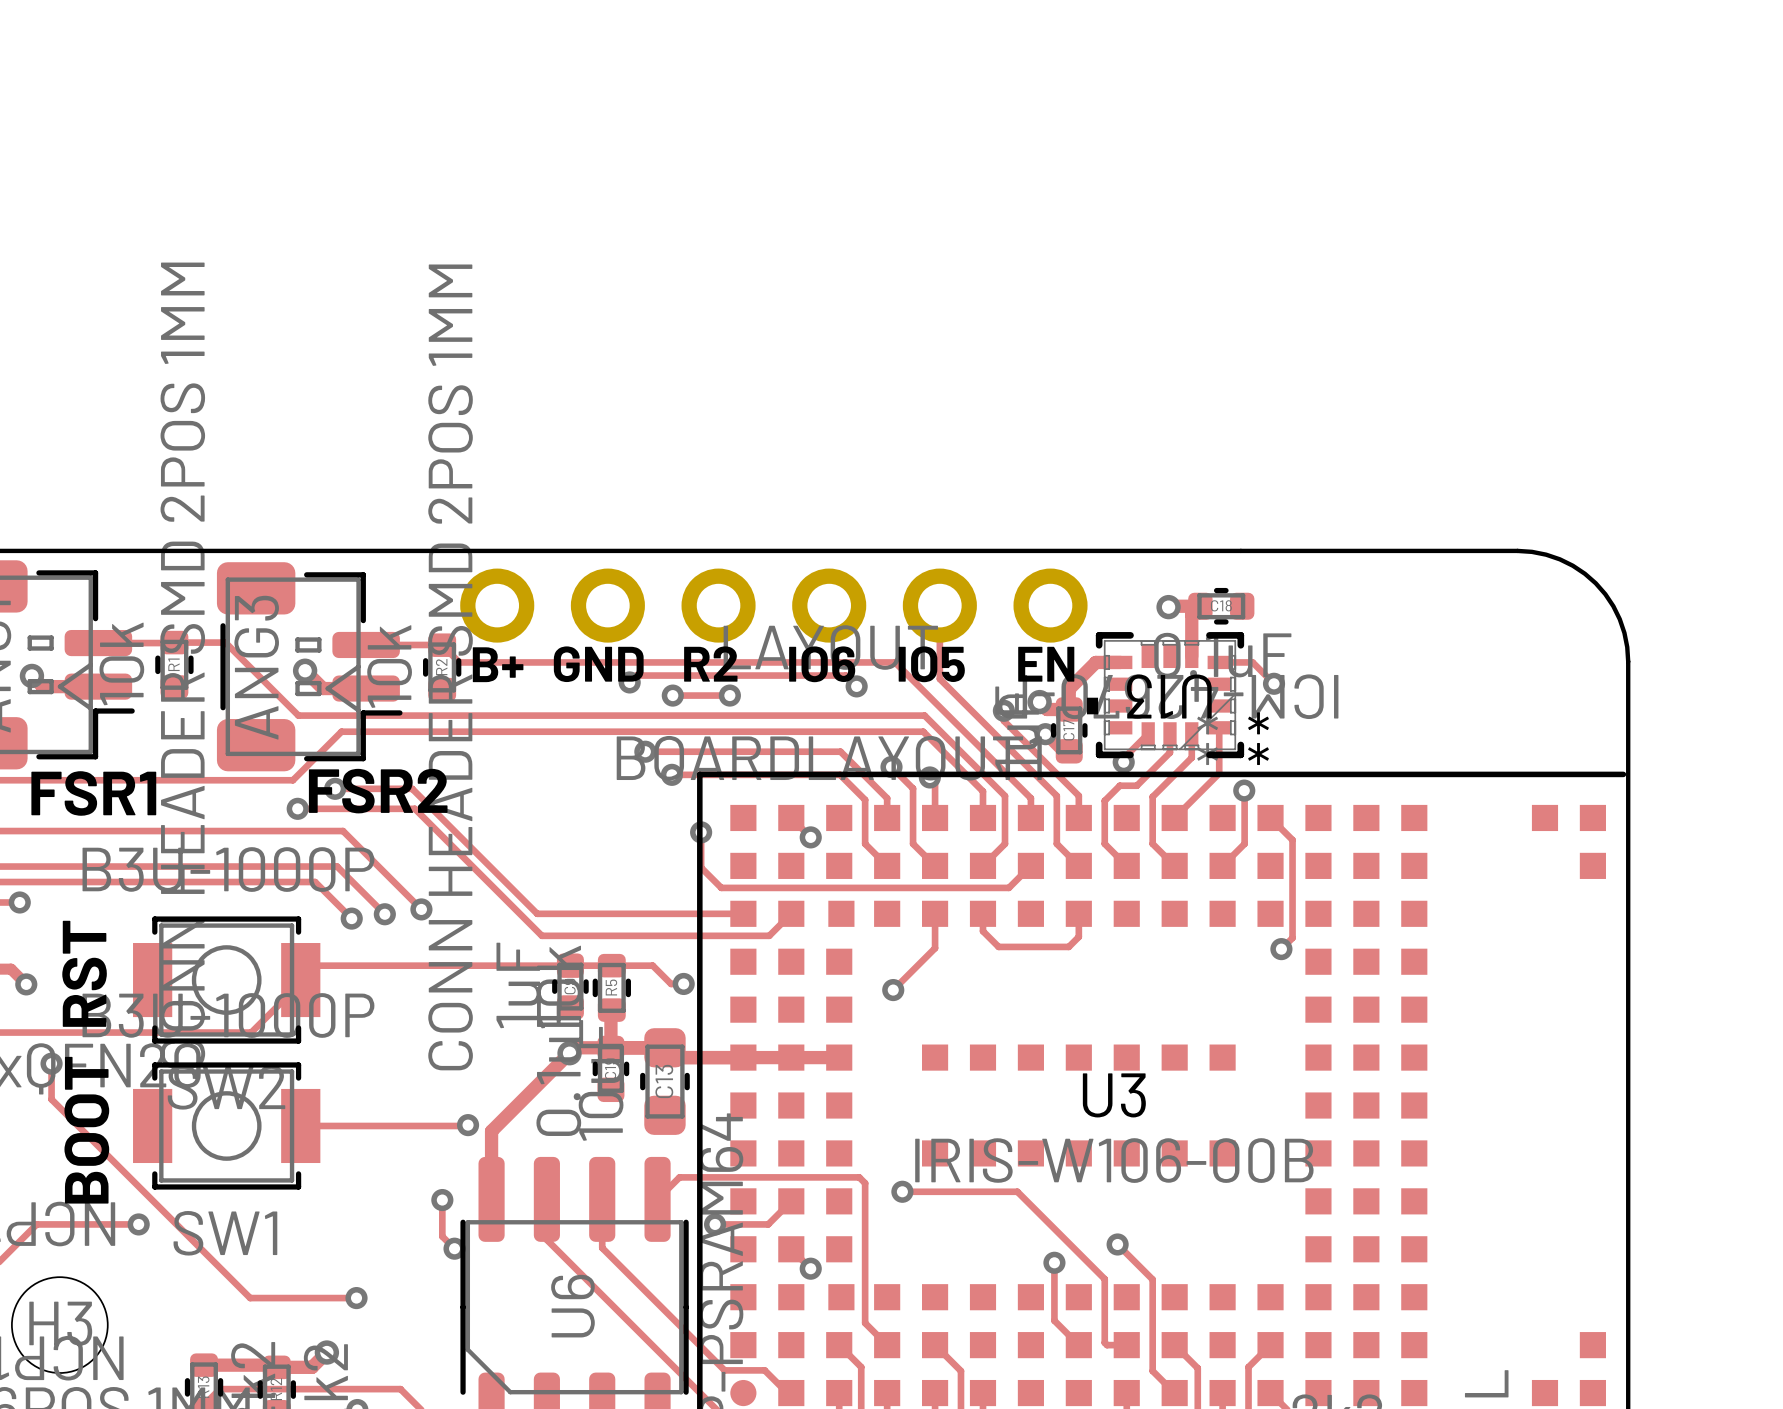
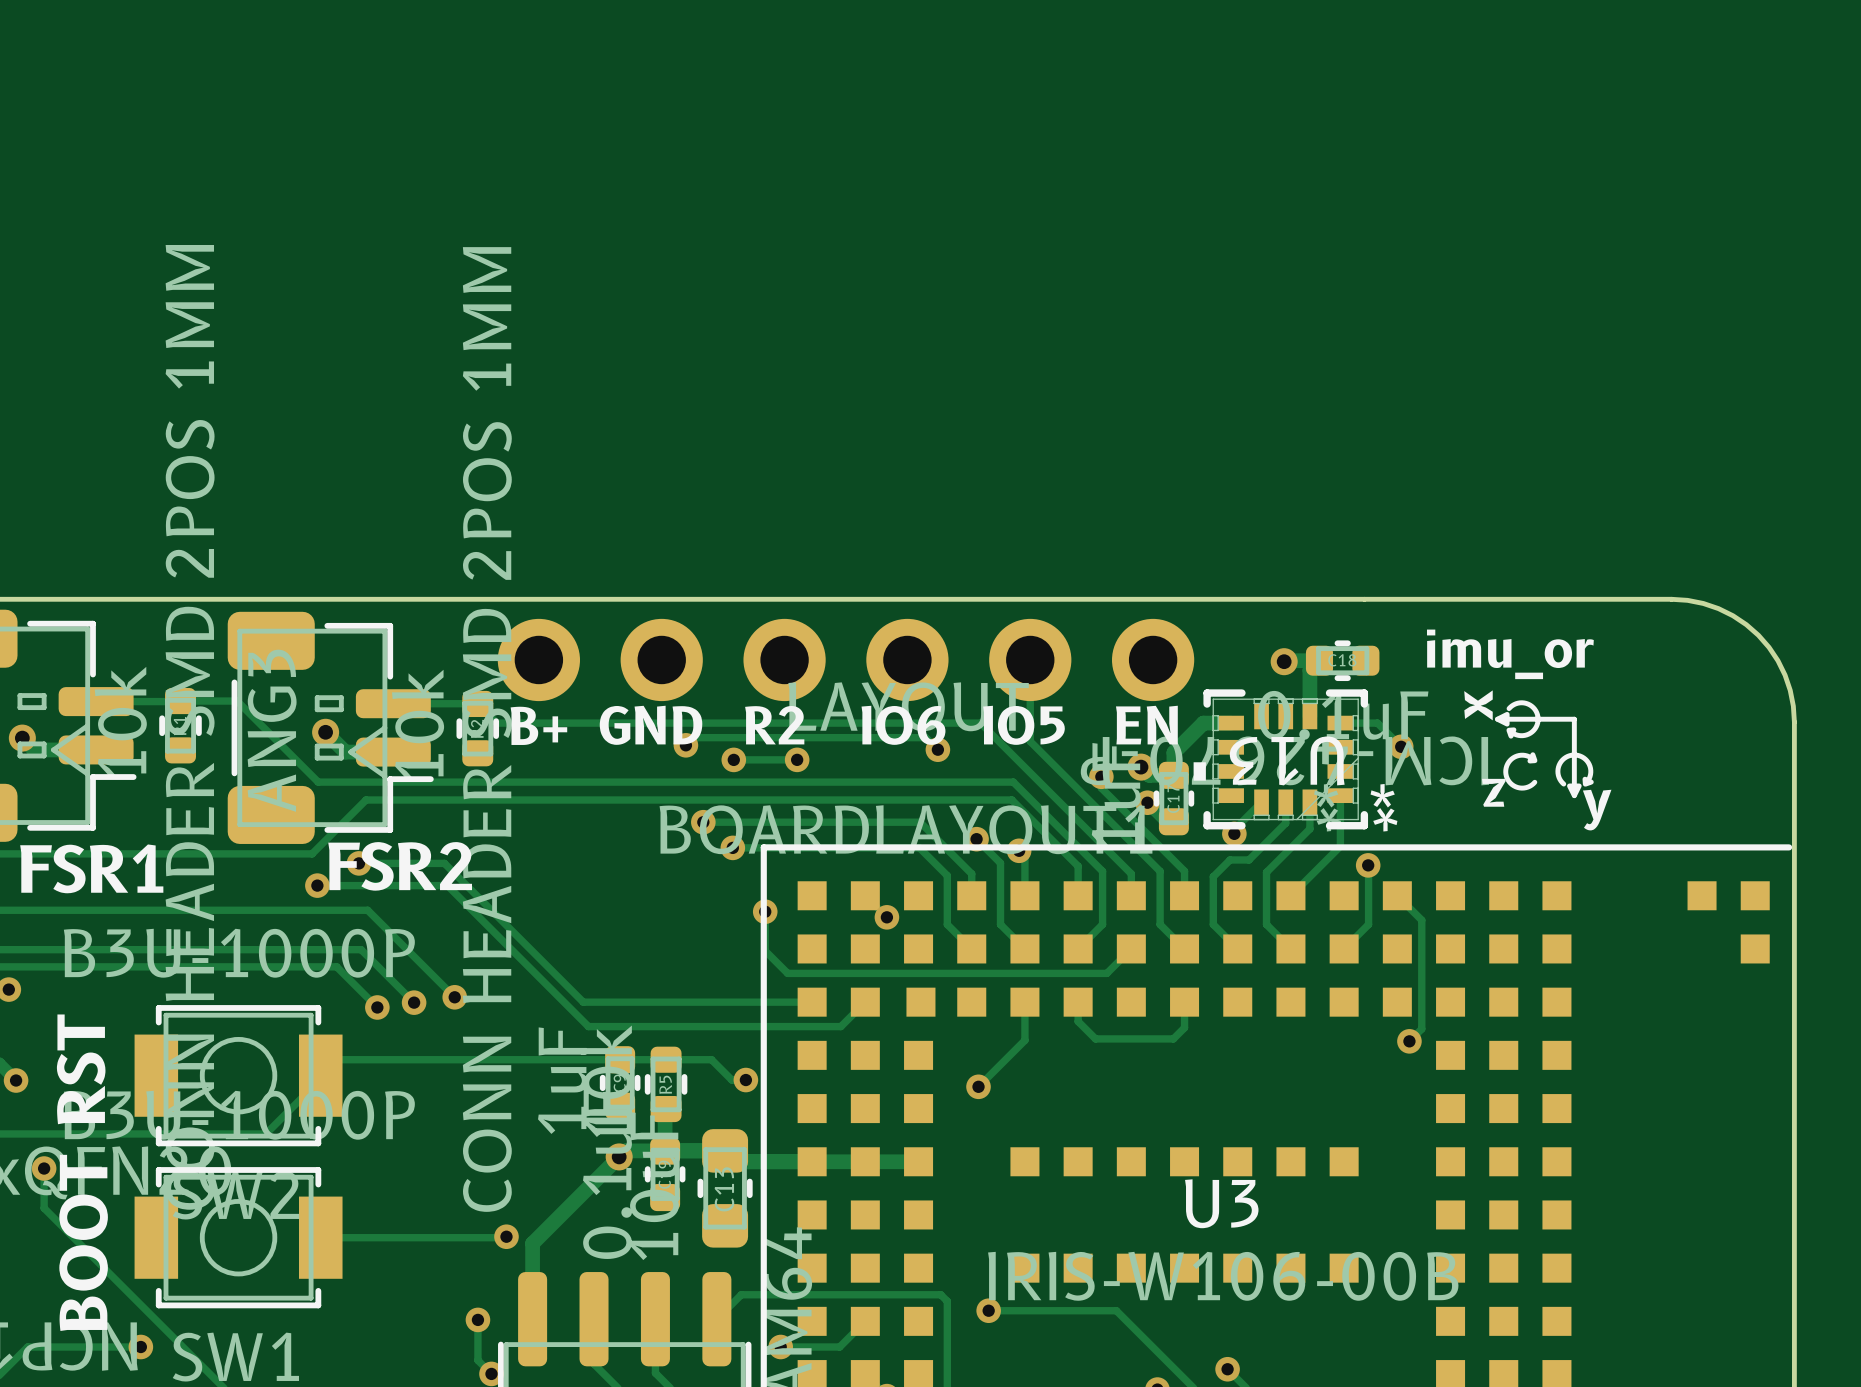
text: none -> imu_or (1510, 654)
text: none -> x (1478, 705)
line: none -> (1509, 708) (1517, 703) (1526, 703) (1534, 709) (1537, 716) (1536, 726) (1530, 733) (1522, 735) (1512, 733)
drawing: none -> [1495, 711, 1594, 799]
line: none -> (1497, 719) (1574, 719) (1574, 795)
line: none -> (1531, 757) (1521, 755) (1513, 757) (1507, 763) (1505, 774) (1510, 783) (1517, 787) (1528, 787) (1534, 782)
line: none -> (1588, 780) (1590, 770) (1588, 762) (1582, 756) (1571, 755) (1562, 759) (1558, 766) (1558, 777) (1563, 784)
text: none -> z (1493, 792)
text: none -> y (1597, 810)

